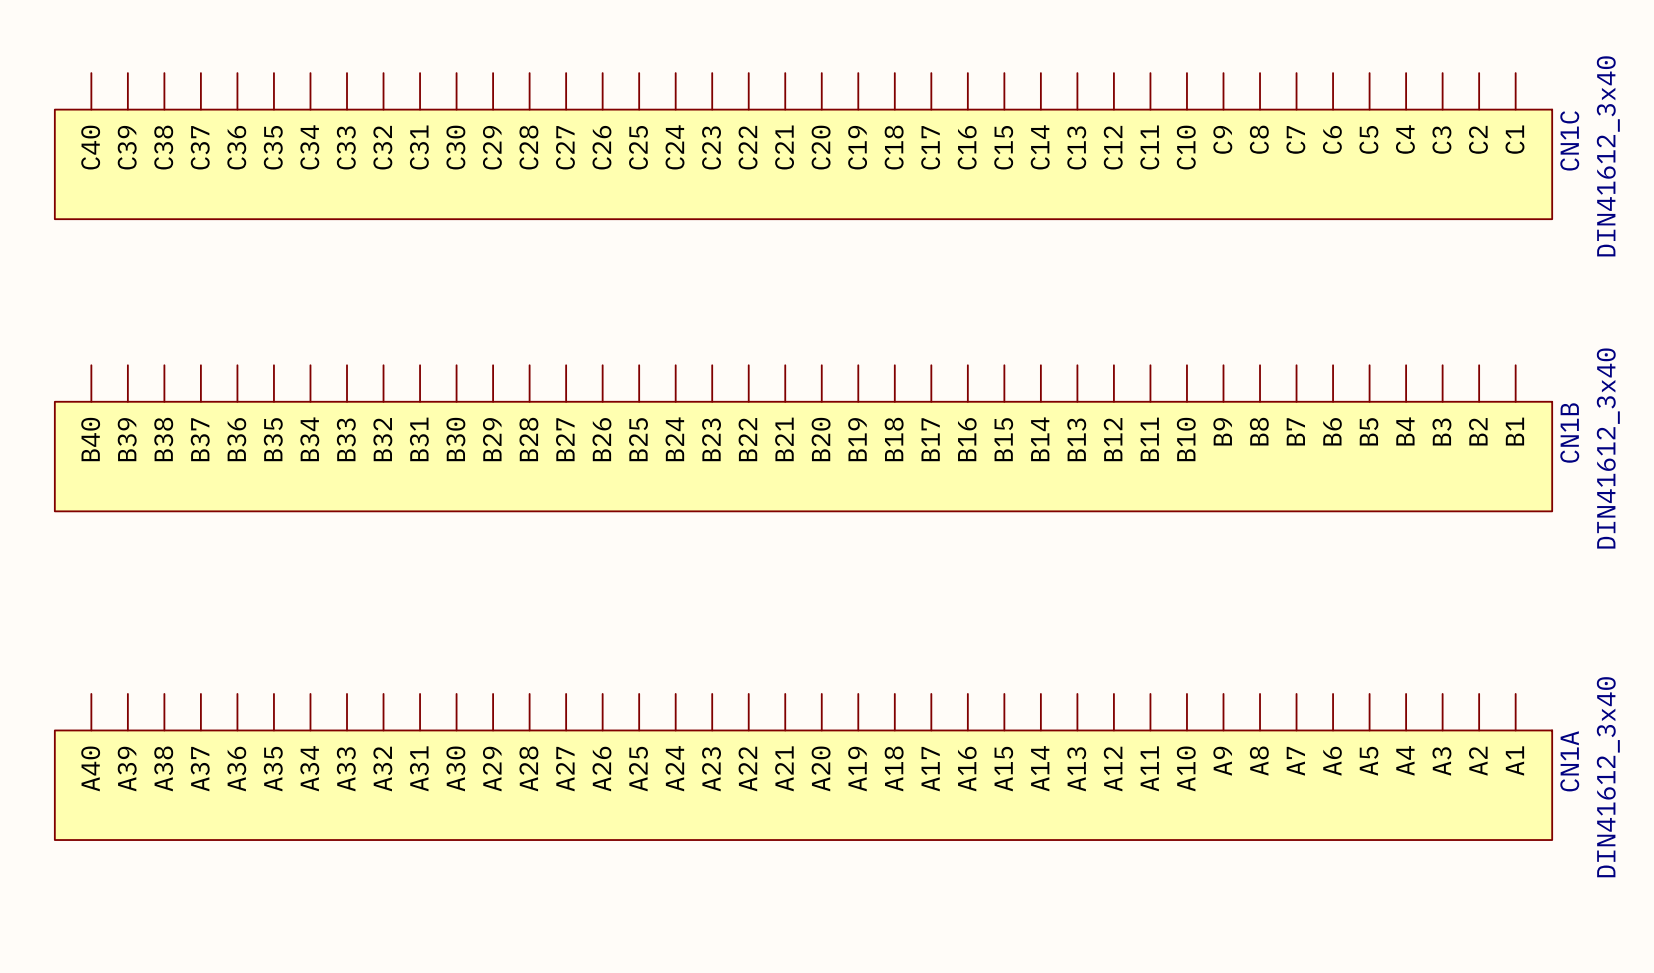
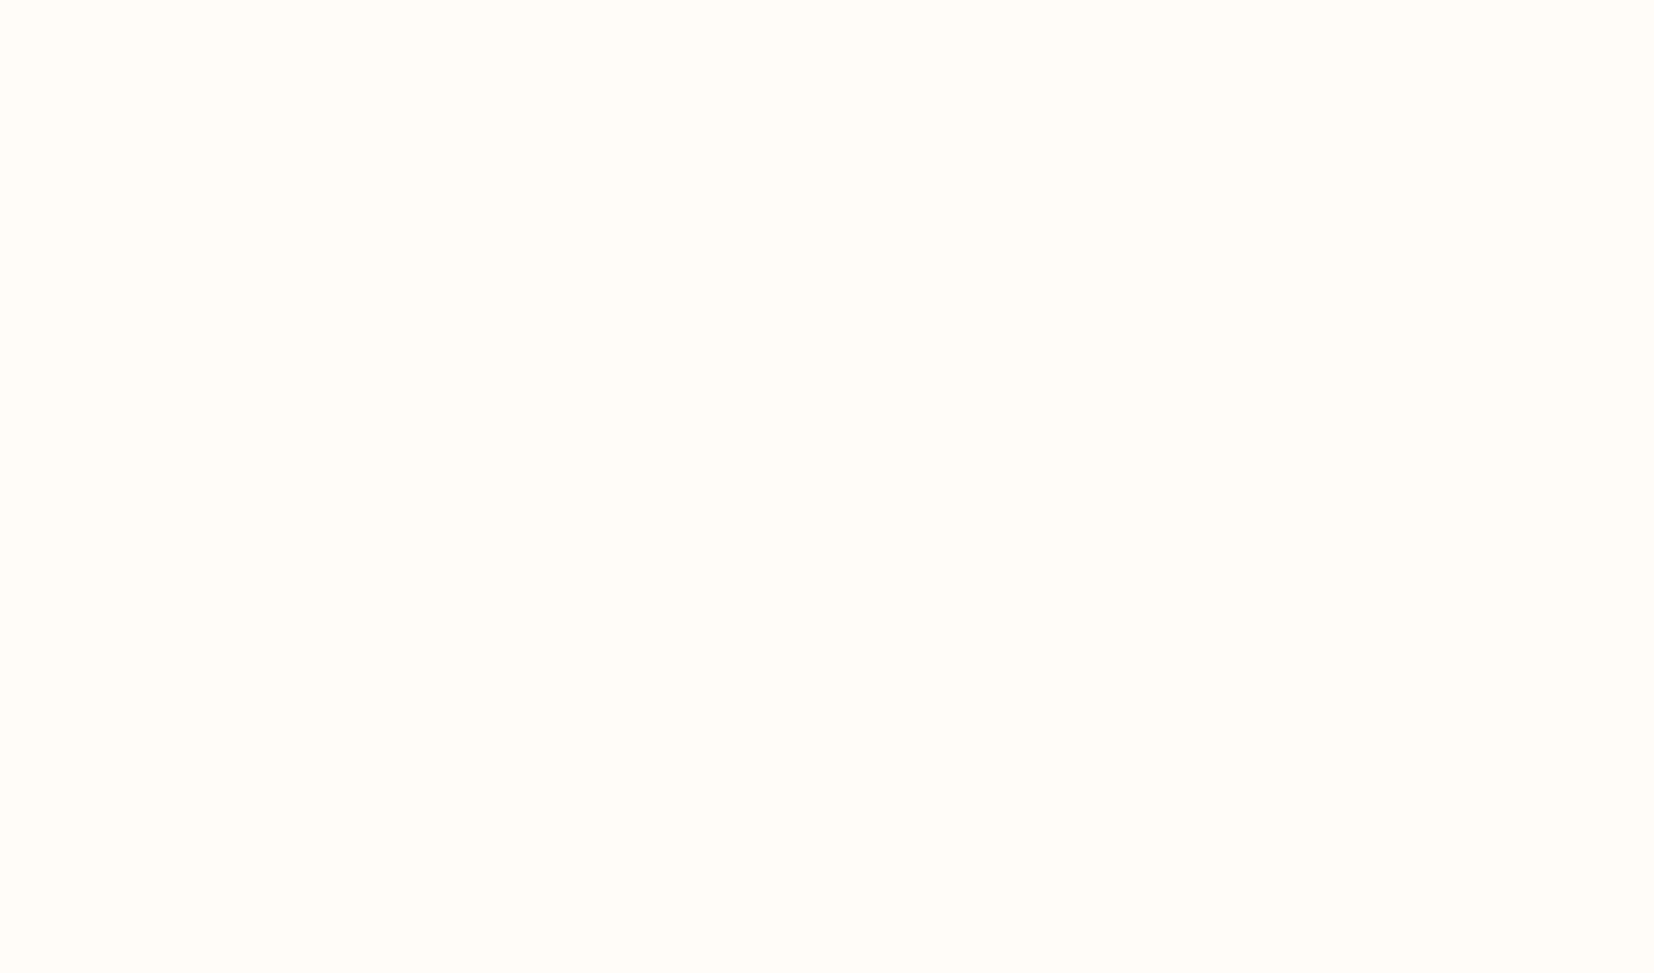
CN1C: DIN41612_3x40 (803, 146) -> none
CN1B: DIN41612_3x40 (803, 438) -> none
CN1A: DIN41612_3x40 (803, 766) -> none

